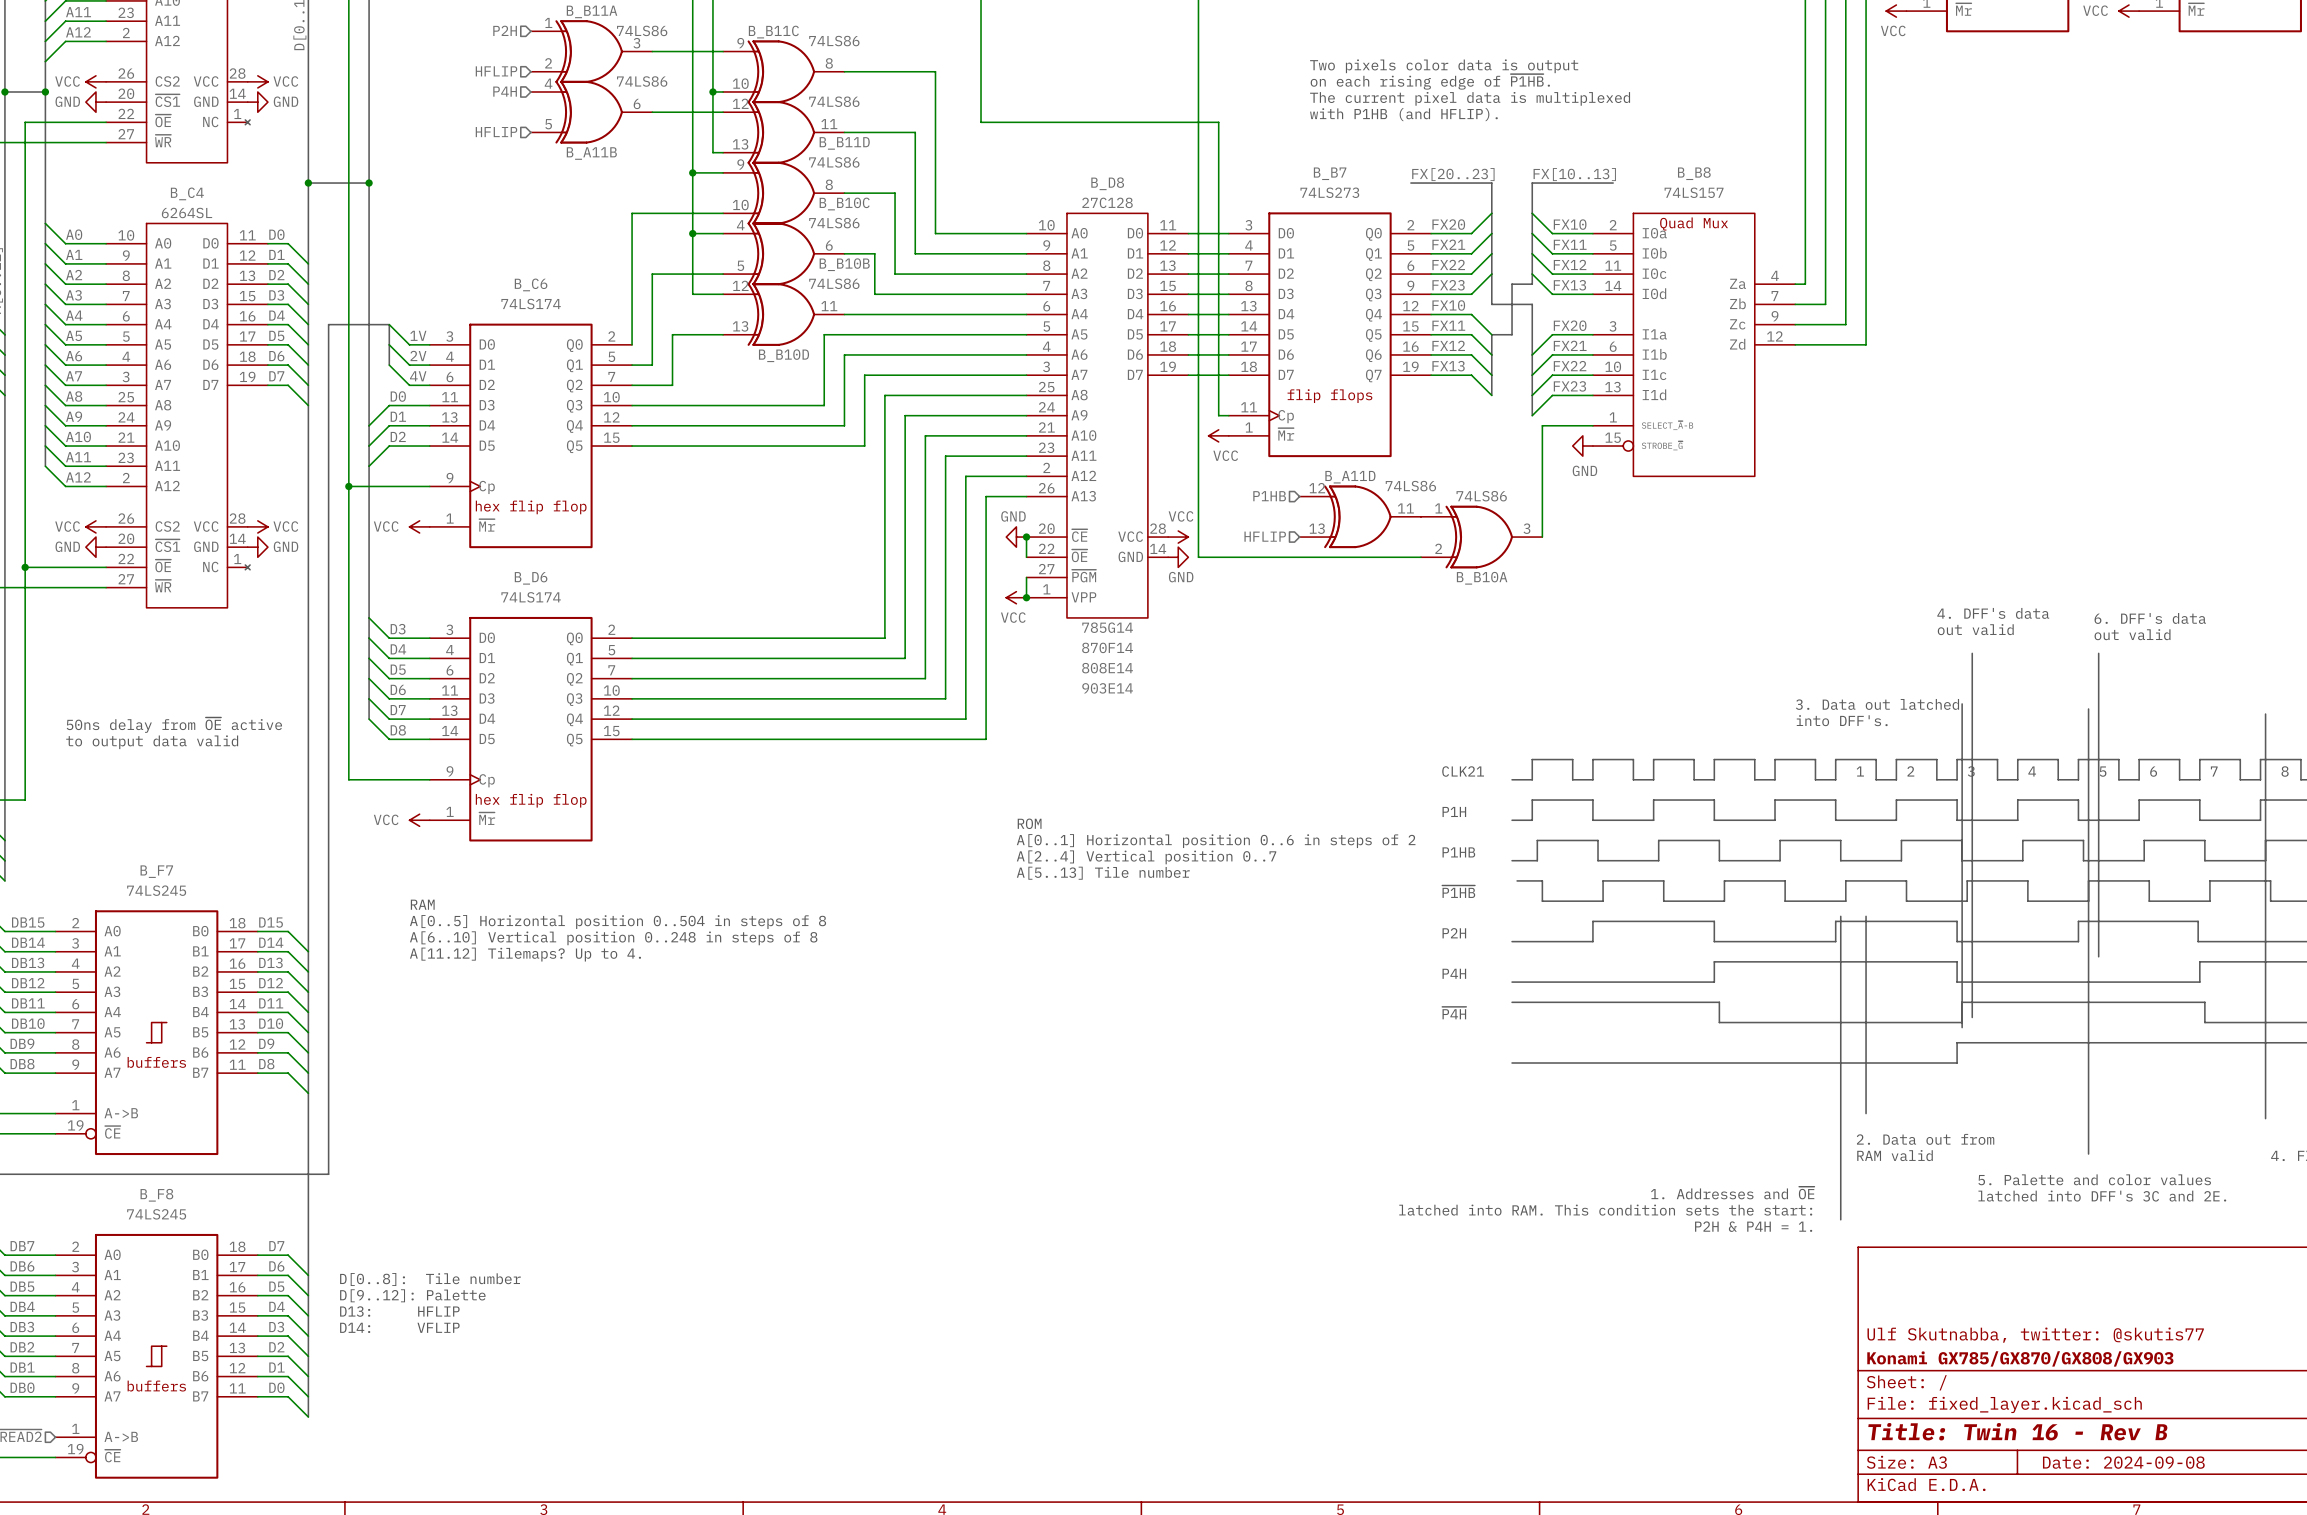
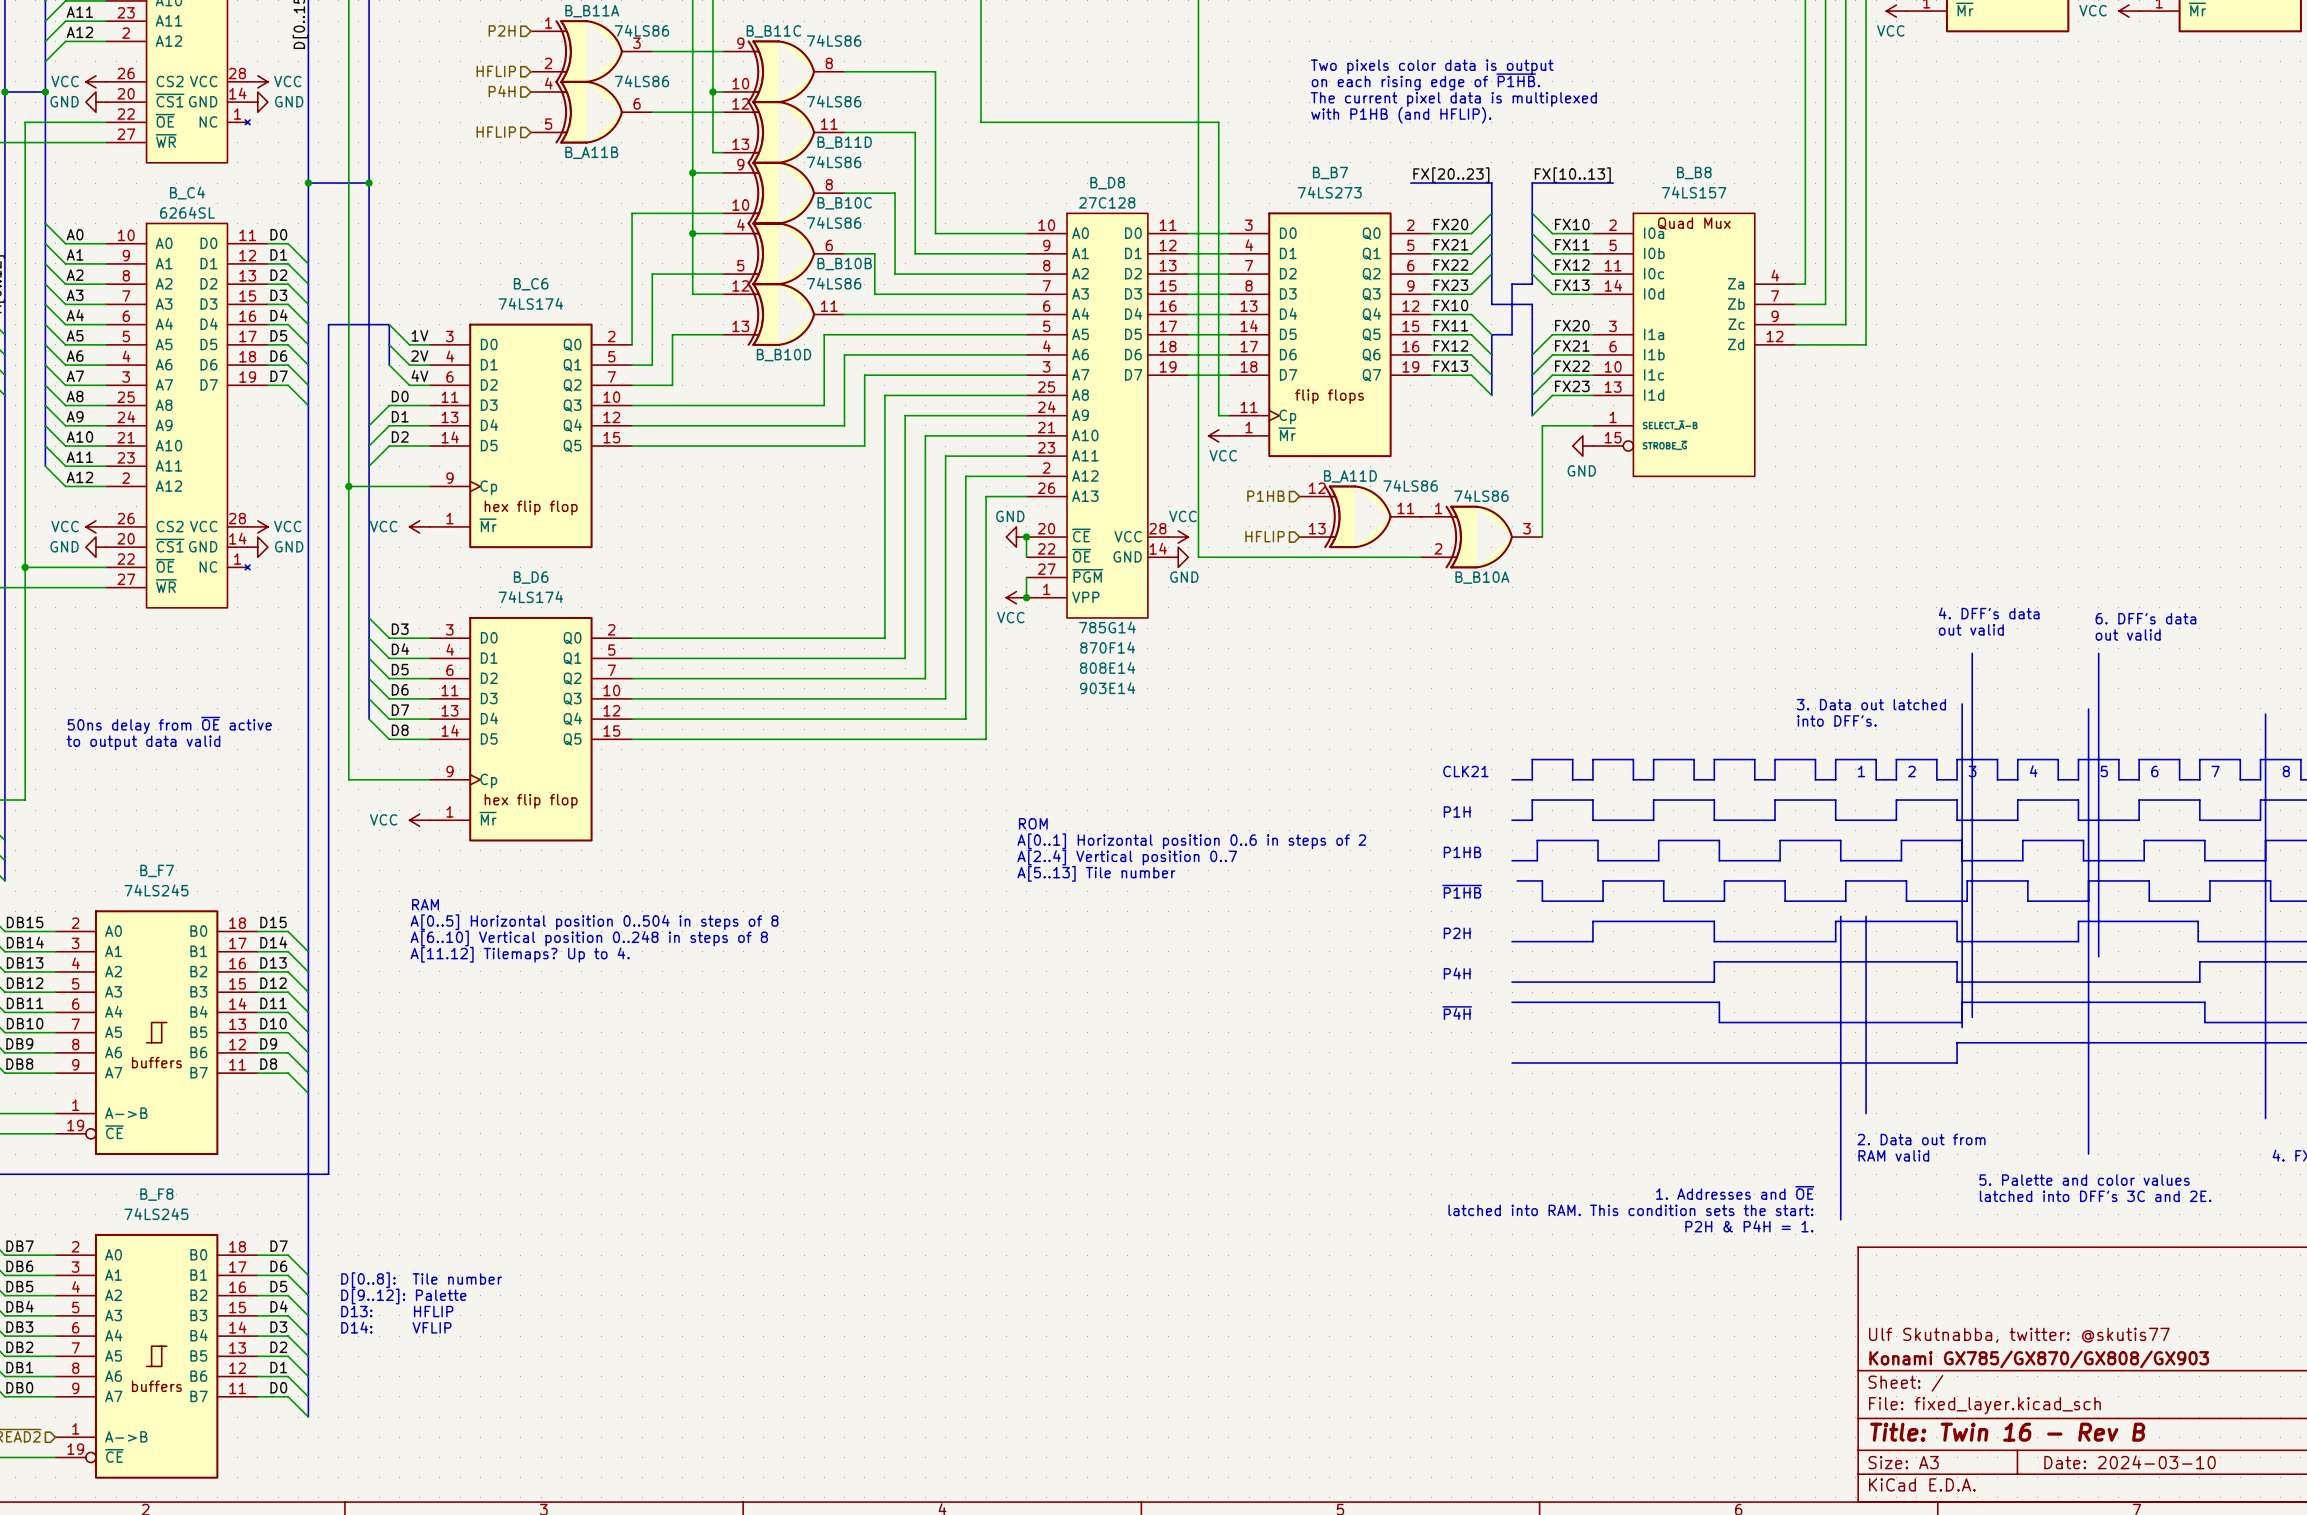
title block: Date: 2024-09-08 (2123, 1462) -> Date: 2024-03-10 (2130, 1462)

